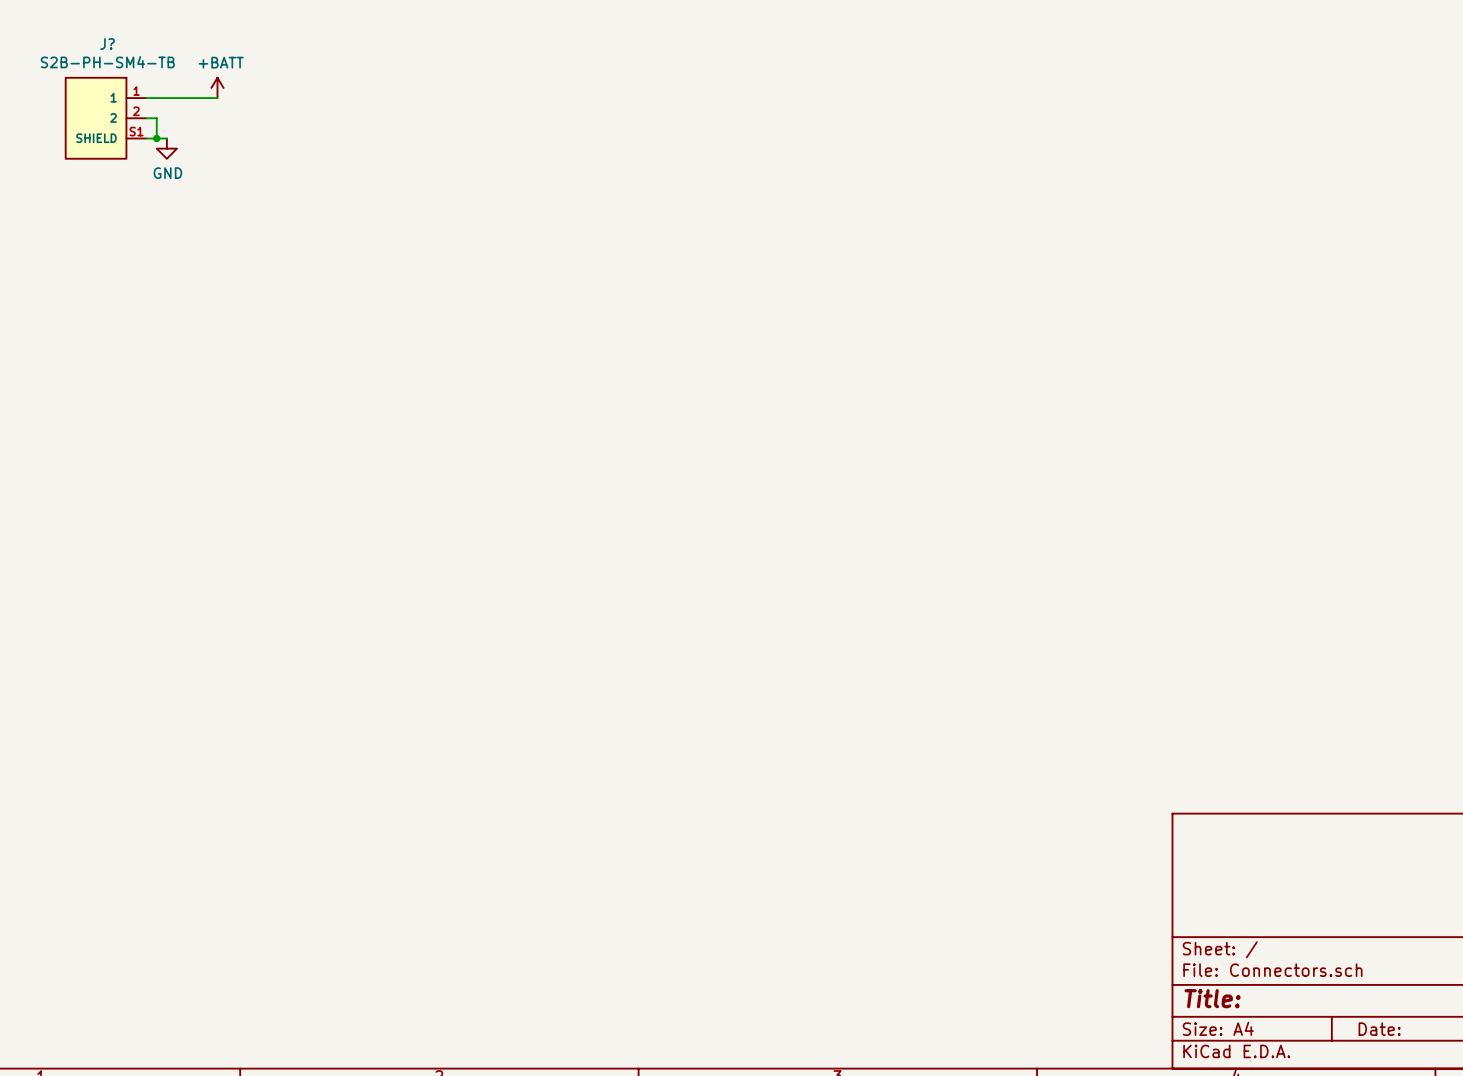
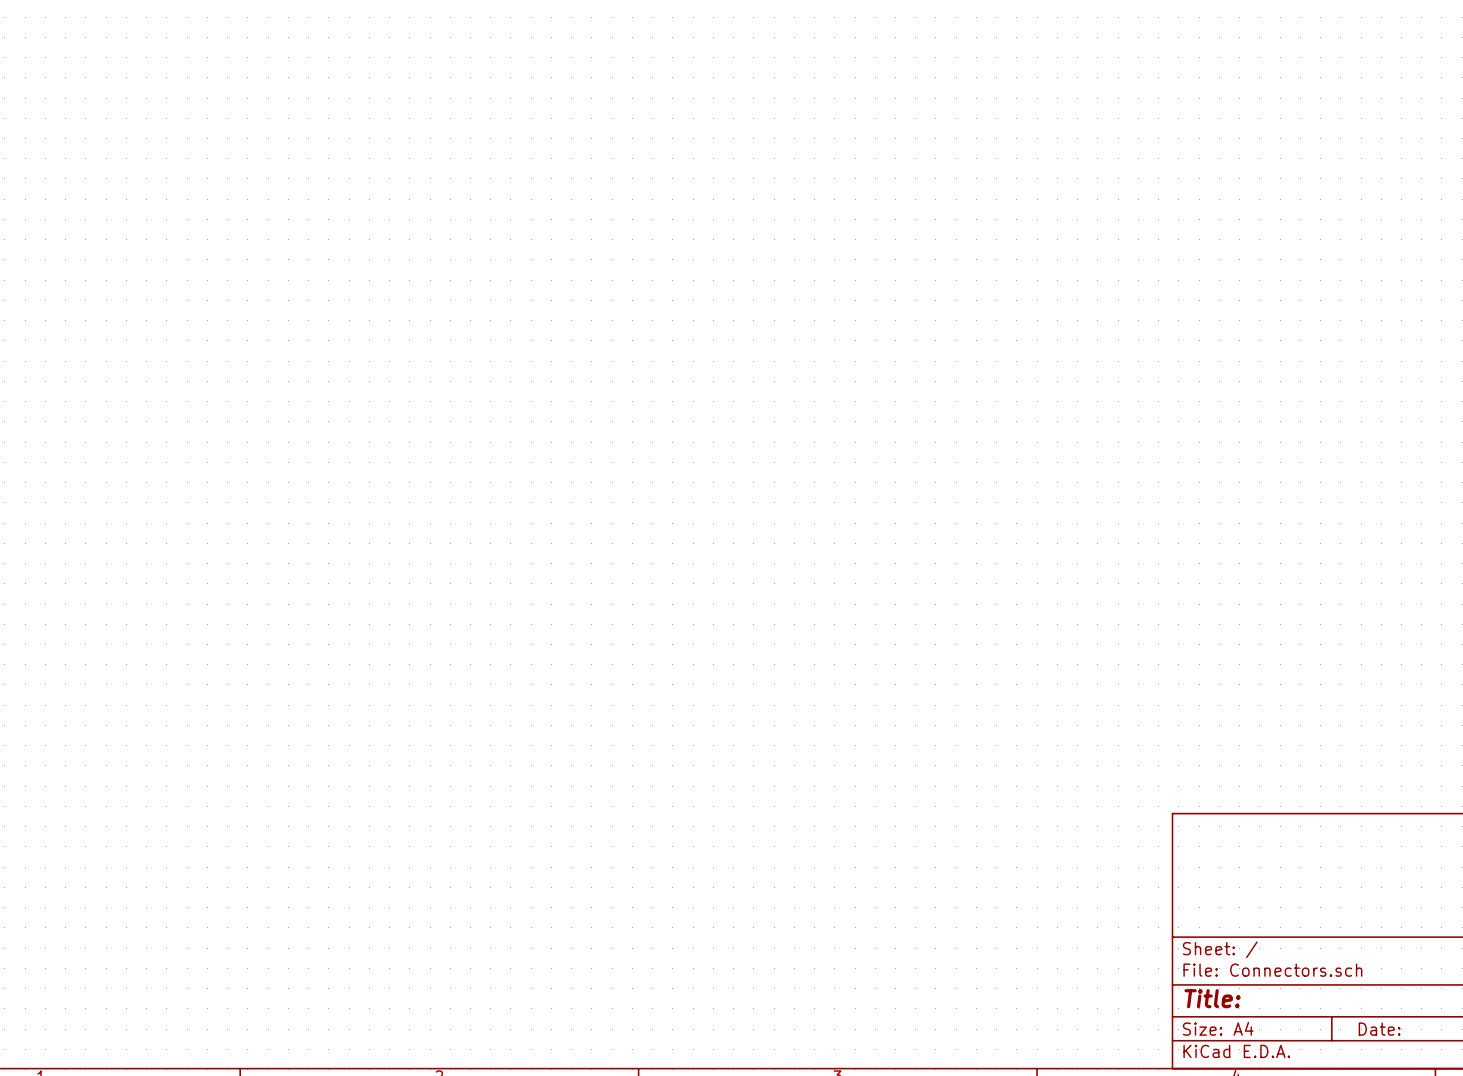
power symbol: +BATT (217, 87) -> none
wire: (146, 98) (217, 98) -> none
J?: S2B-PH-SM4-TB (106, 118) -> none
wire: (146, 118) (156, 118) (156, 138) -> none
wire: (146, 138) (166, 138) -> none
junction: (156, 138) -> none
power symbol: GND (166, 148) -> none

